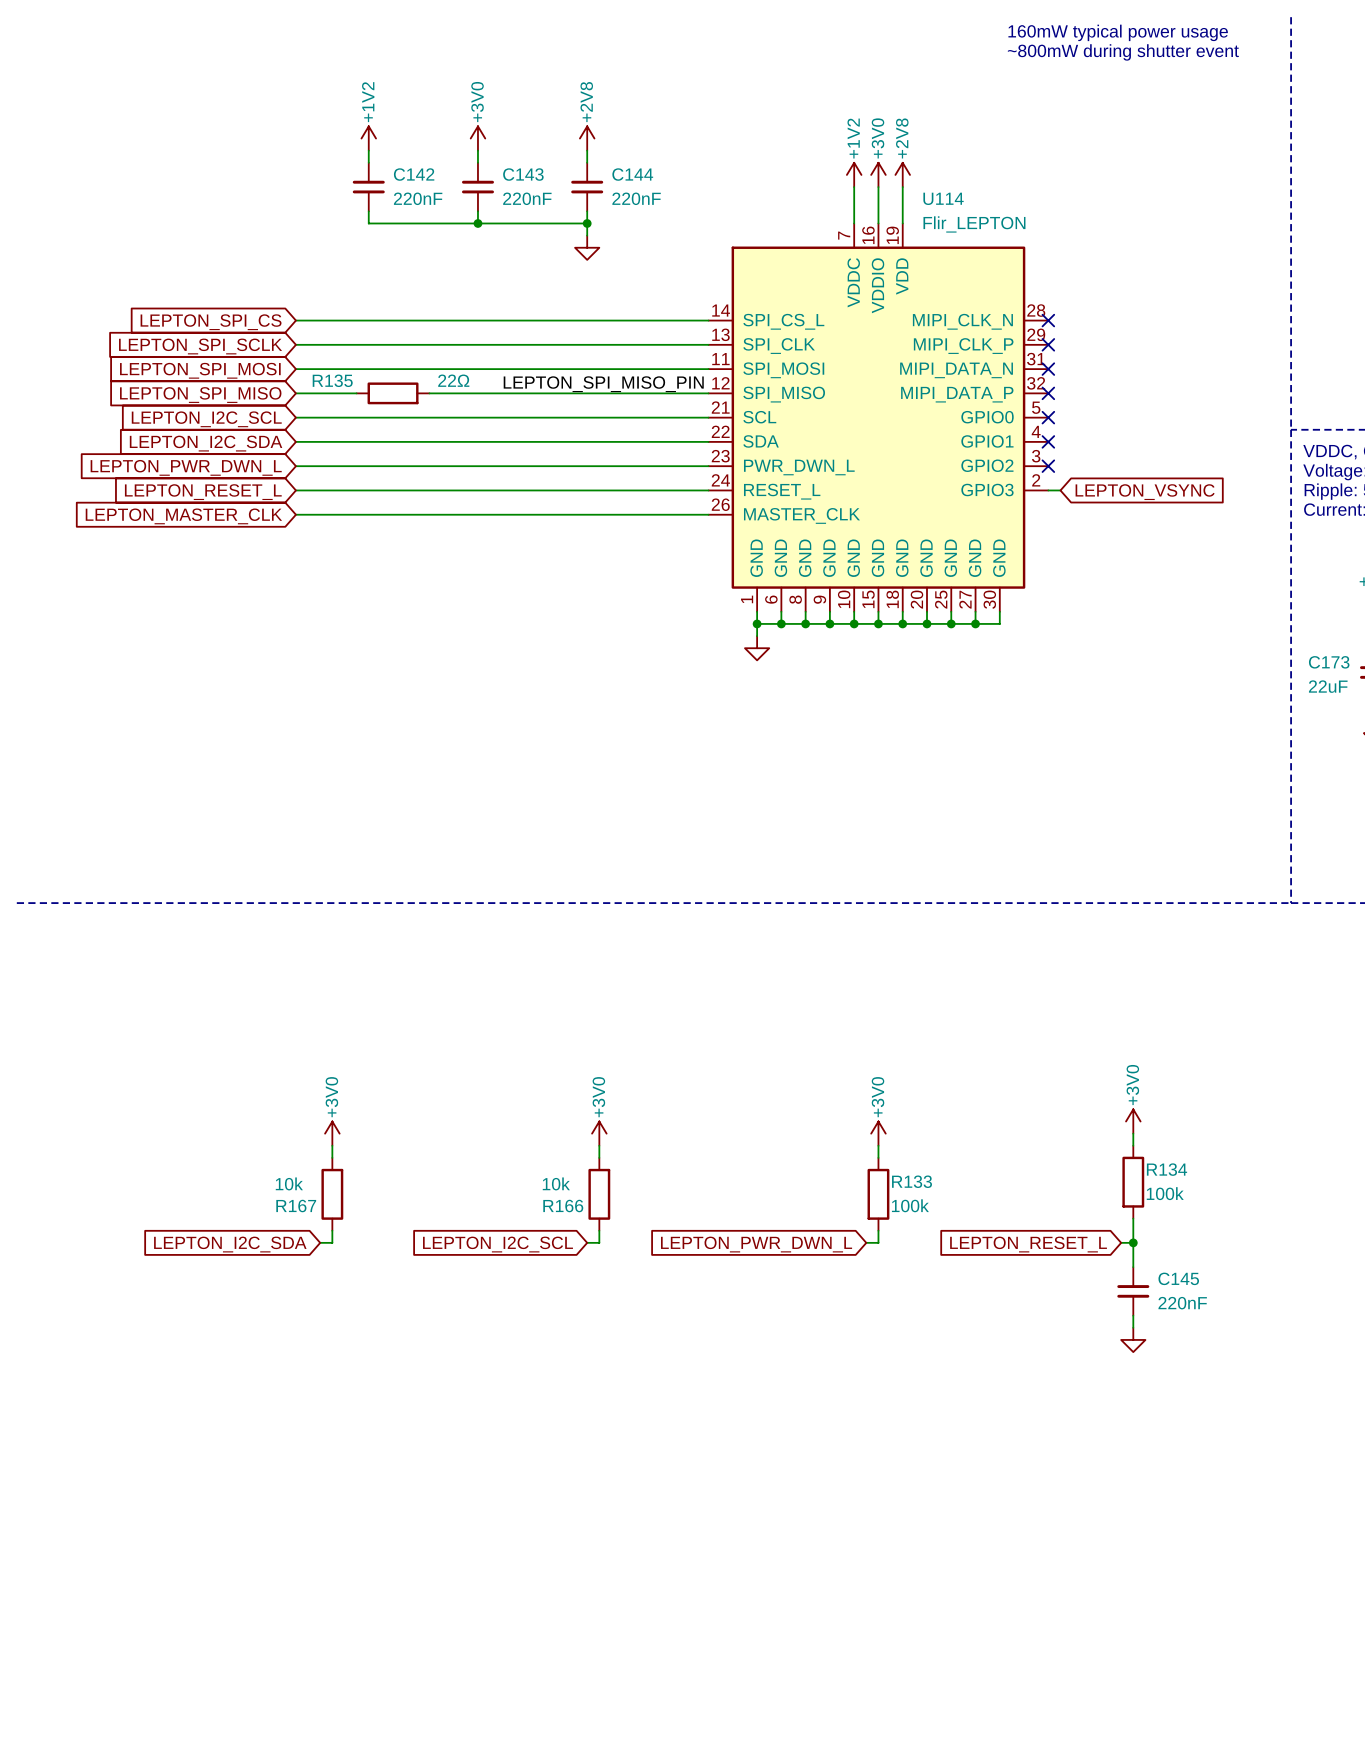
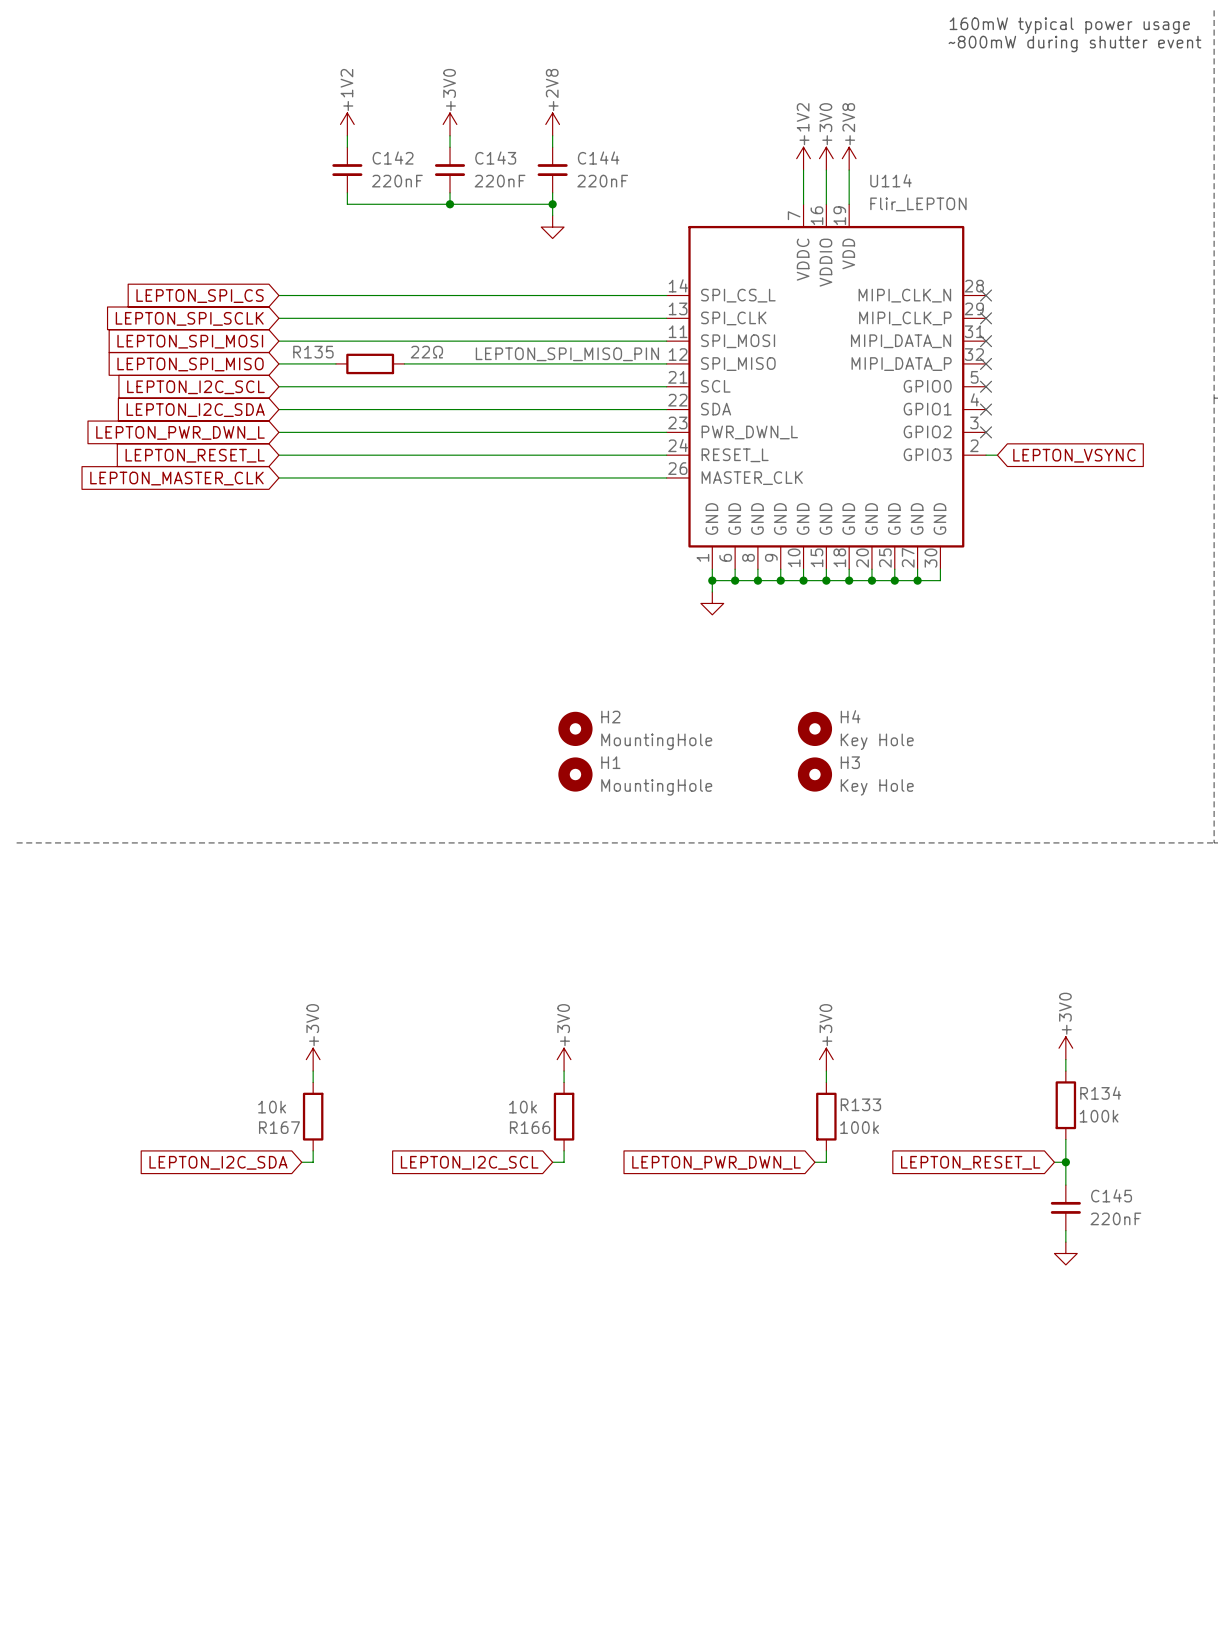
H2: none -> MountingHole (575, 728)
H4: none -> Key Hole (814, 728)
H1: none -> MountingHole (575, 774)
H3: none -> Key Hole (814, 774)

